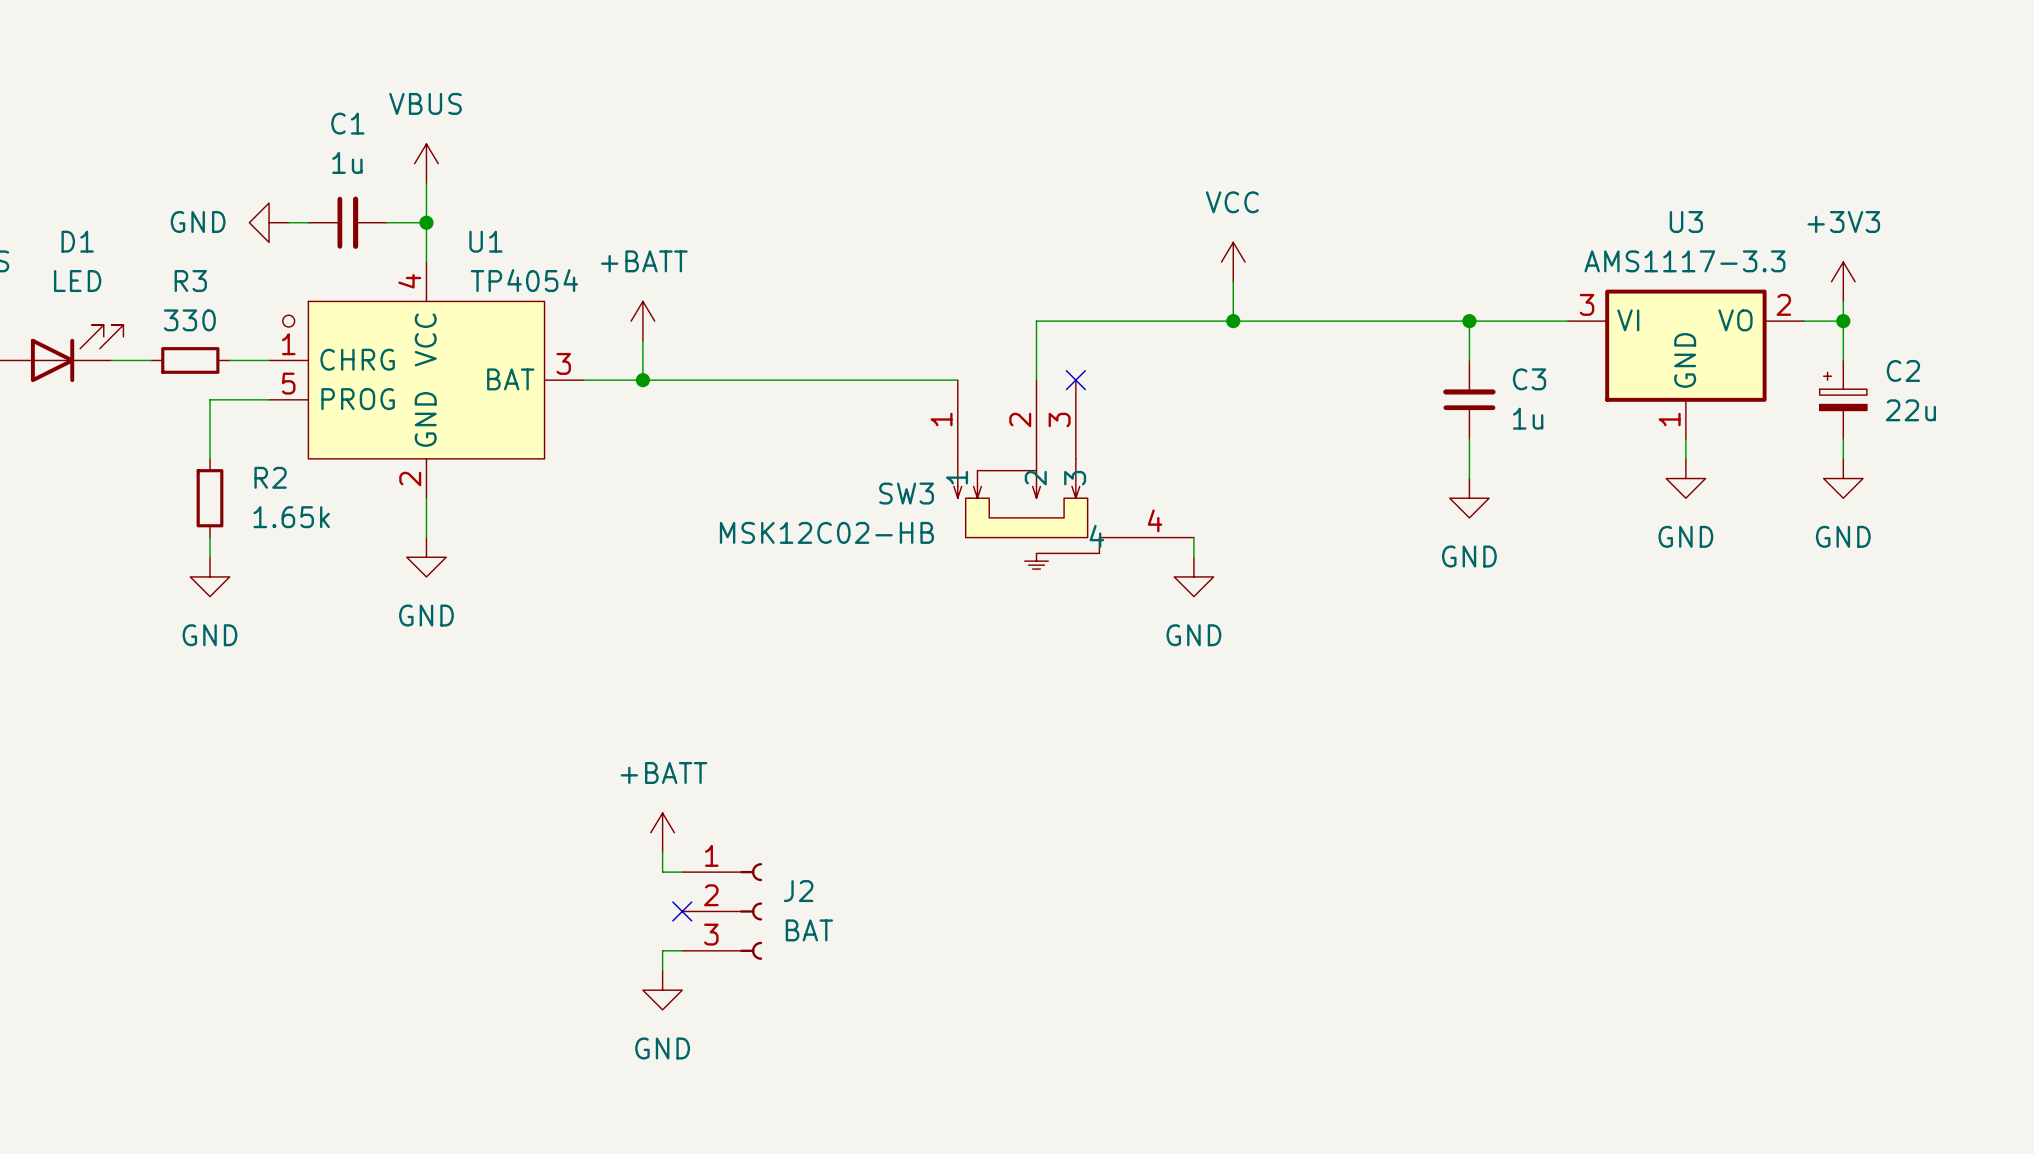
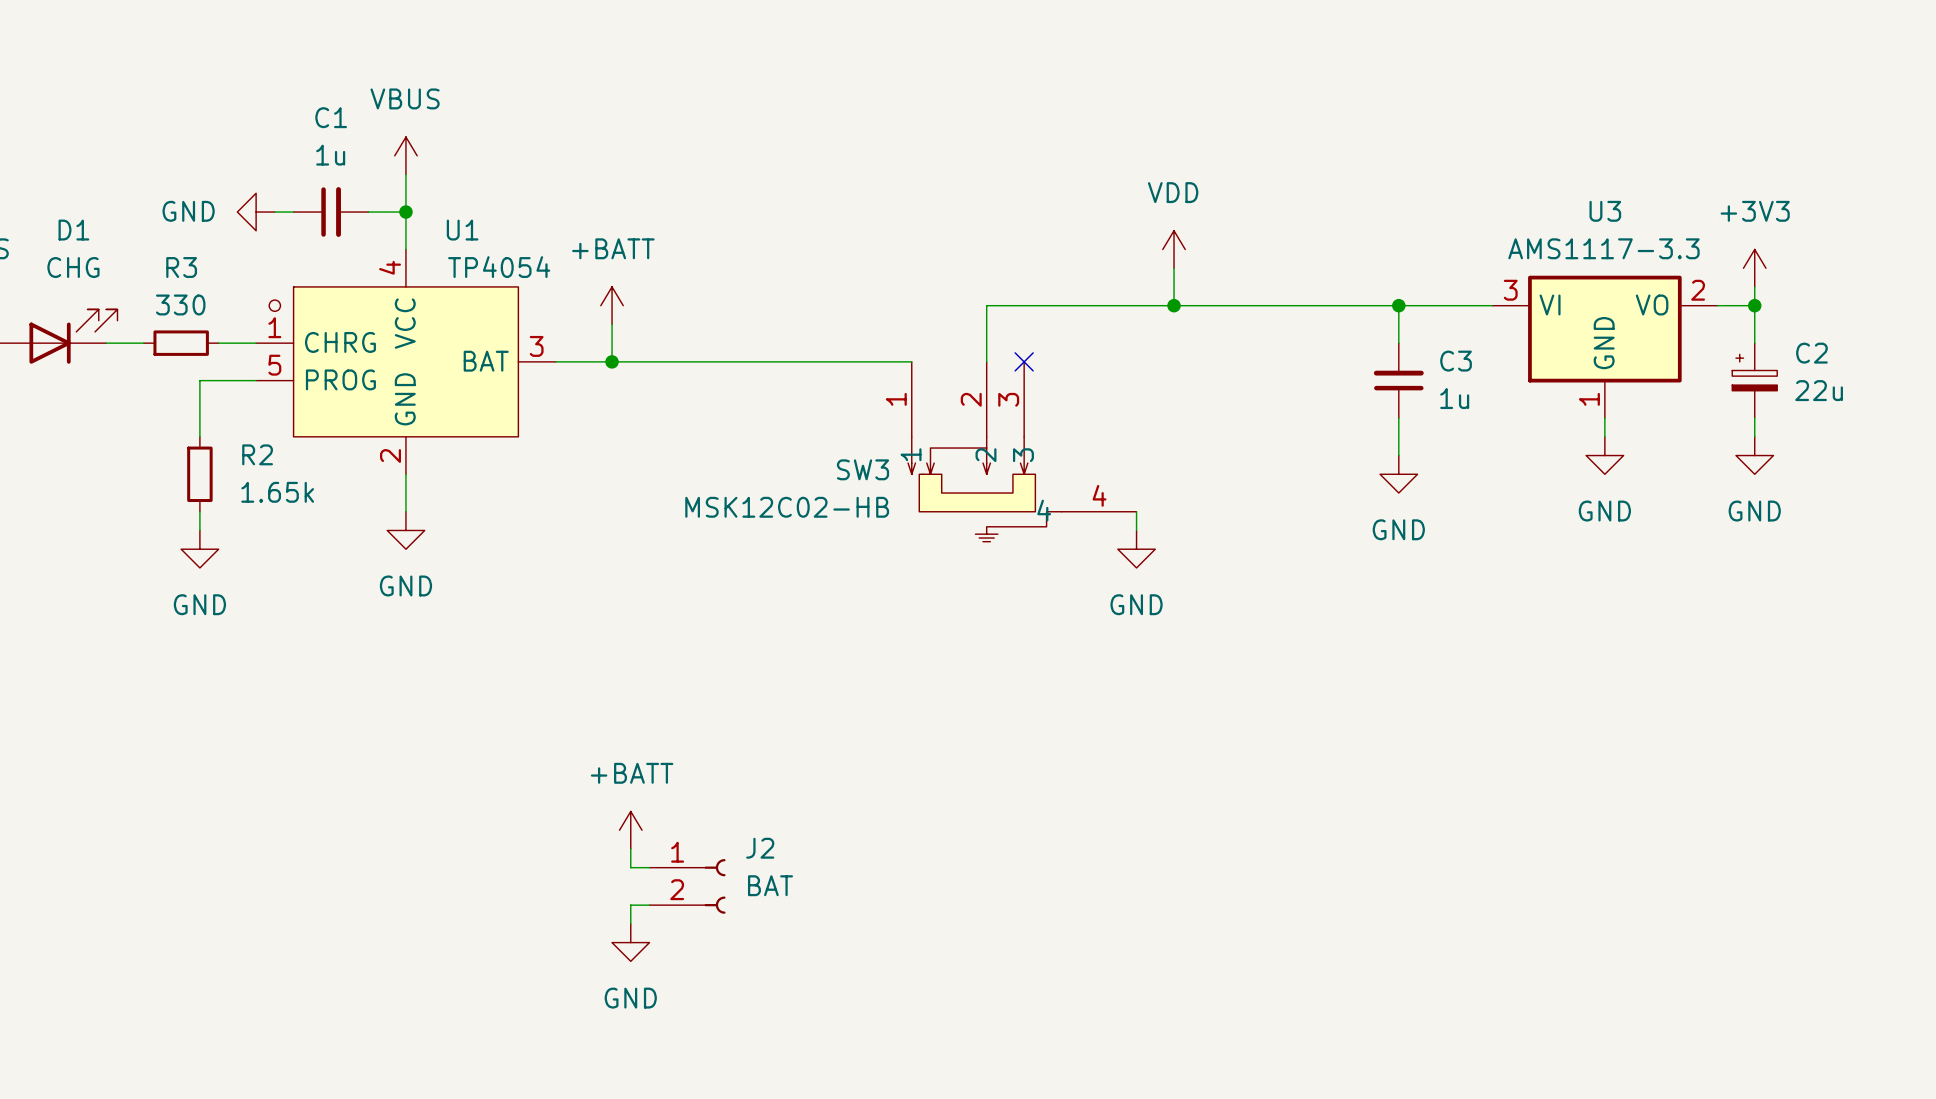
power symbol: VCC (1233, 262) -> VDD (1174, 249)
D1 value: LED (77, 281) -> CHG (73, 267)
power symbol position: +BATT (662, 832) -> +BATT (630, 830)
wire: (662, 852) (662, 872) (682, 872) -> (630, 848) (630, 867) (649, 867)
J2 symbol: [682, 863, 763, 960] -> [649, 859, 726, 914]
no-connect mark: (682, 911) -> none

